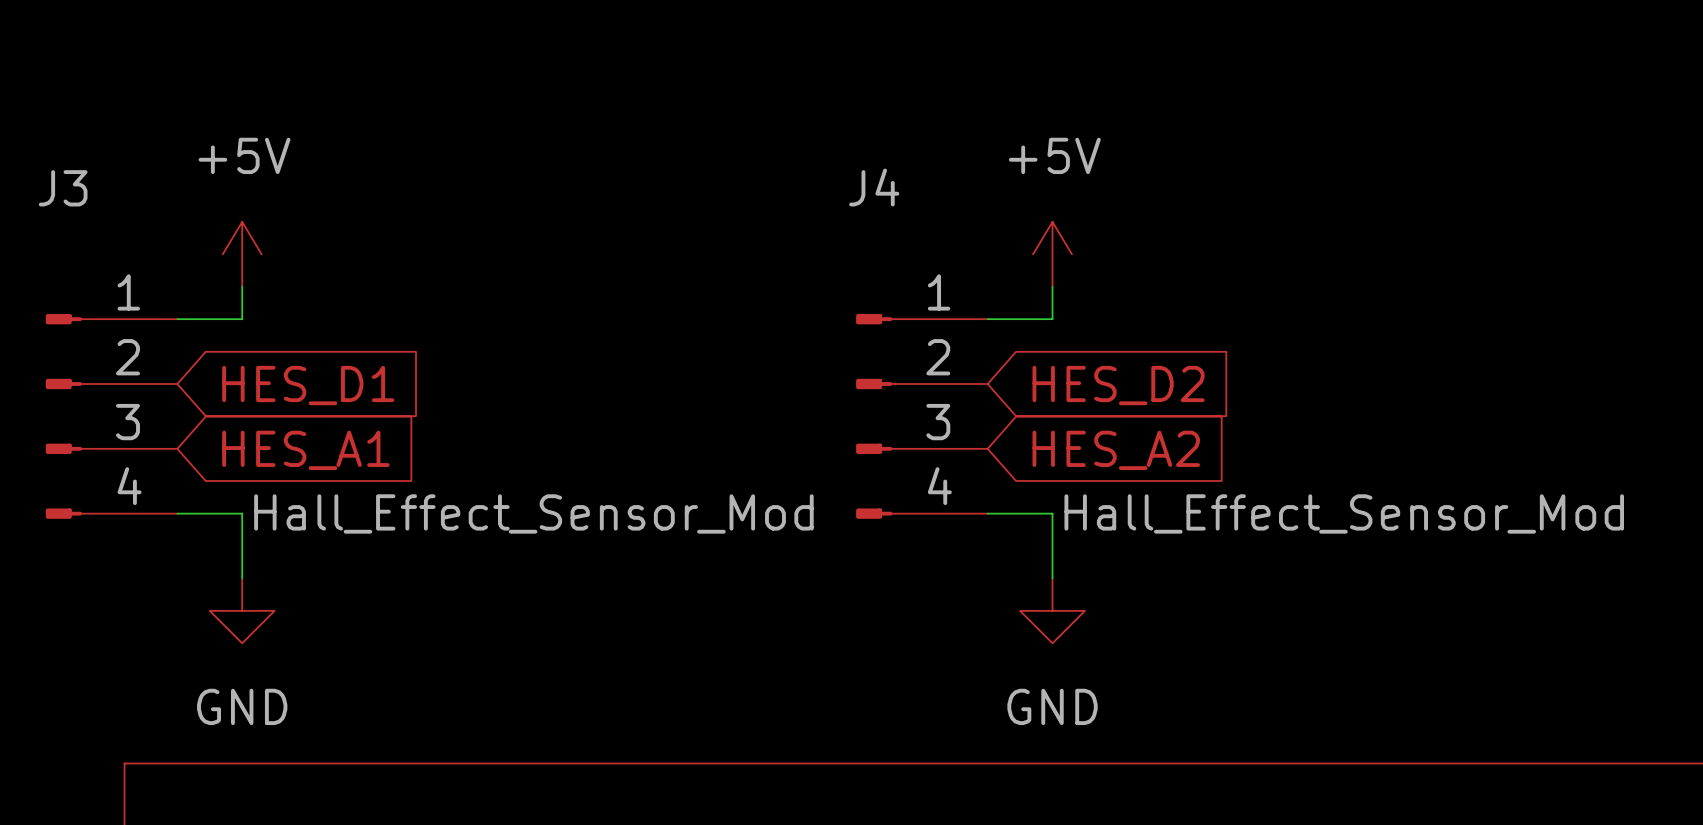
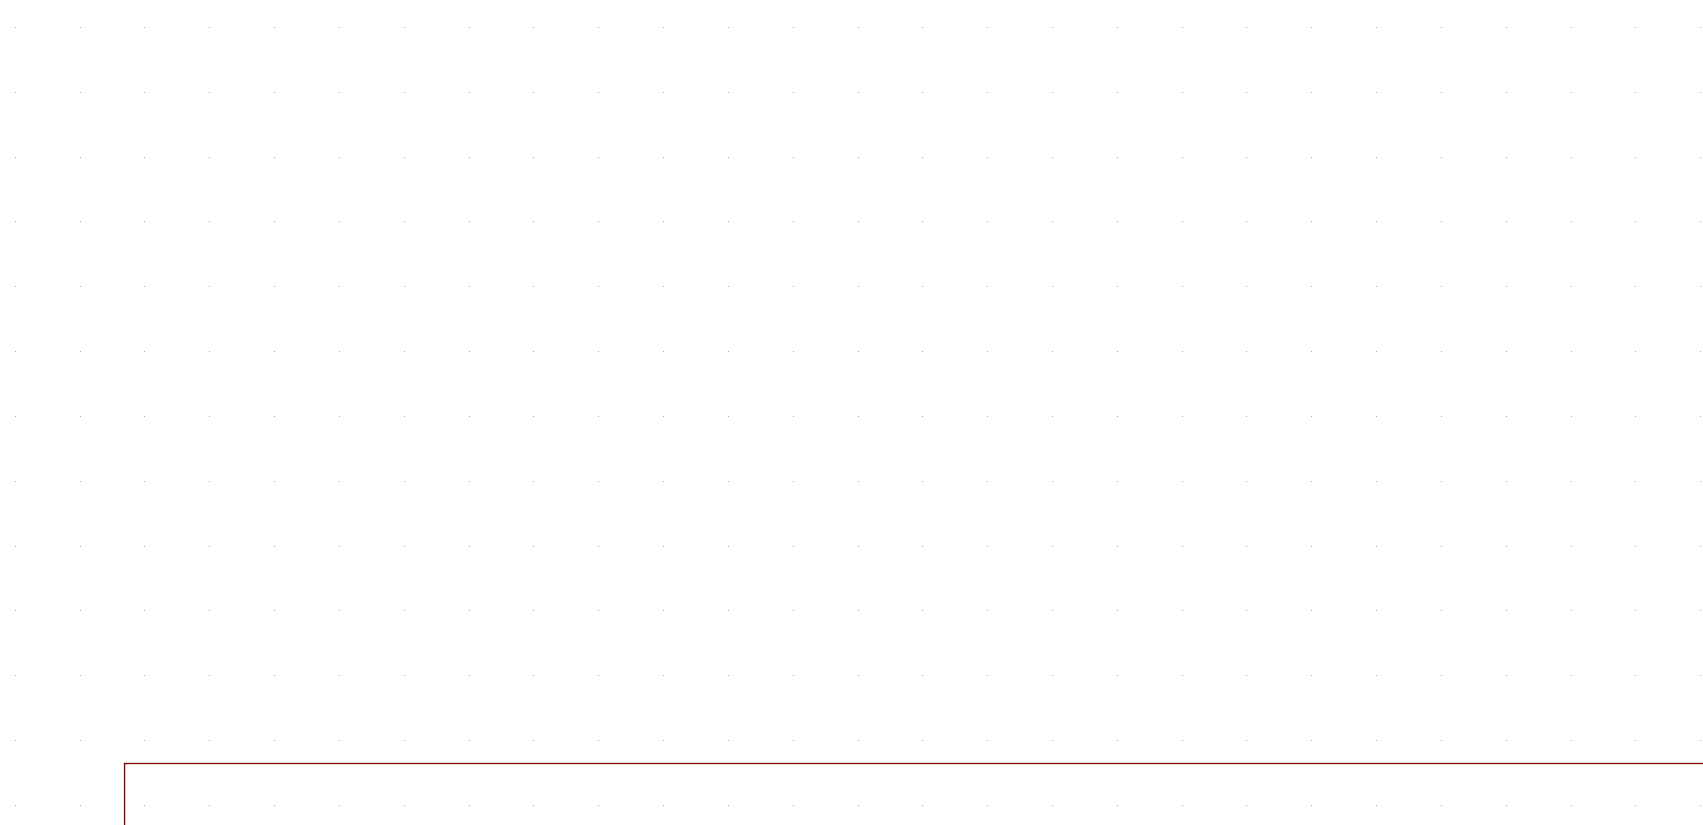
power symbol: +5V (242, 254) -> none
power symbol: +5V (1052, 254) -> none
wire: (242, 286) (242, 319) (177, 319) -> none
wire: (1052, 286) (1052, 319) (987, 319) -> none
global label: HES_D1 (308, 385) -> none
global label: HES_D2 (1118, 385) -> none
J3: Hall_Effect_Sensor_Mod (111, 416) -> none
J4: Hall_Effect_Sensor_Mod (921, 416) -> none
global label: HES_A1 (305, 450) -> none
global label: HES_A2 (1116, 450) -> none
wire: (177, 513) (242, 513) (242, 578) -> none
wire: (987, 513) (1052, 513) (1052, 578) -> none
power symbol: GND (242, 610) -> none
power symbol: GND (1052, 610) -> none

